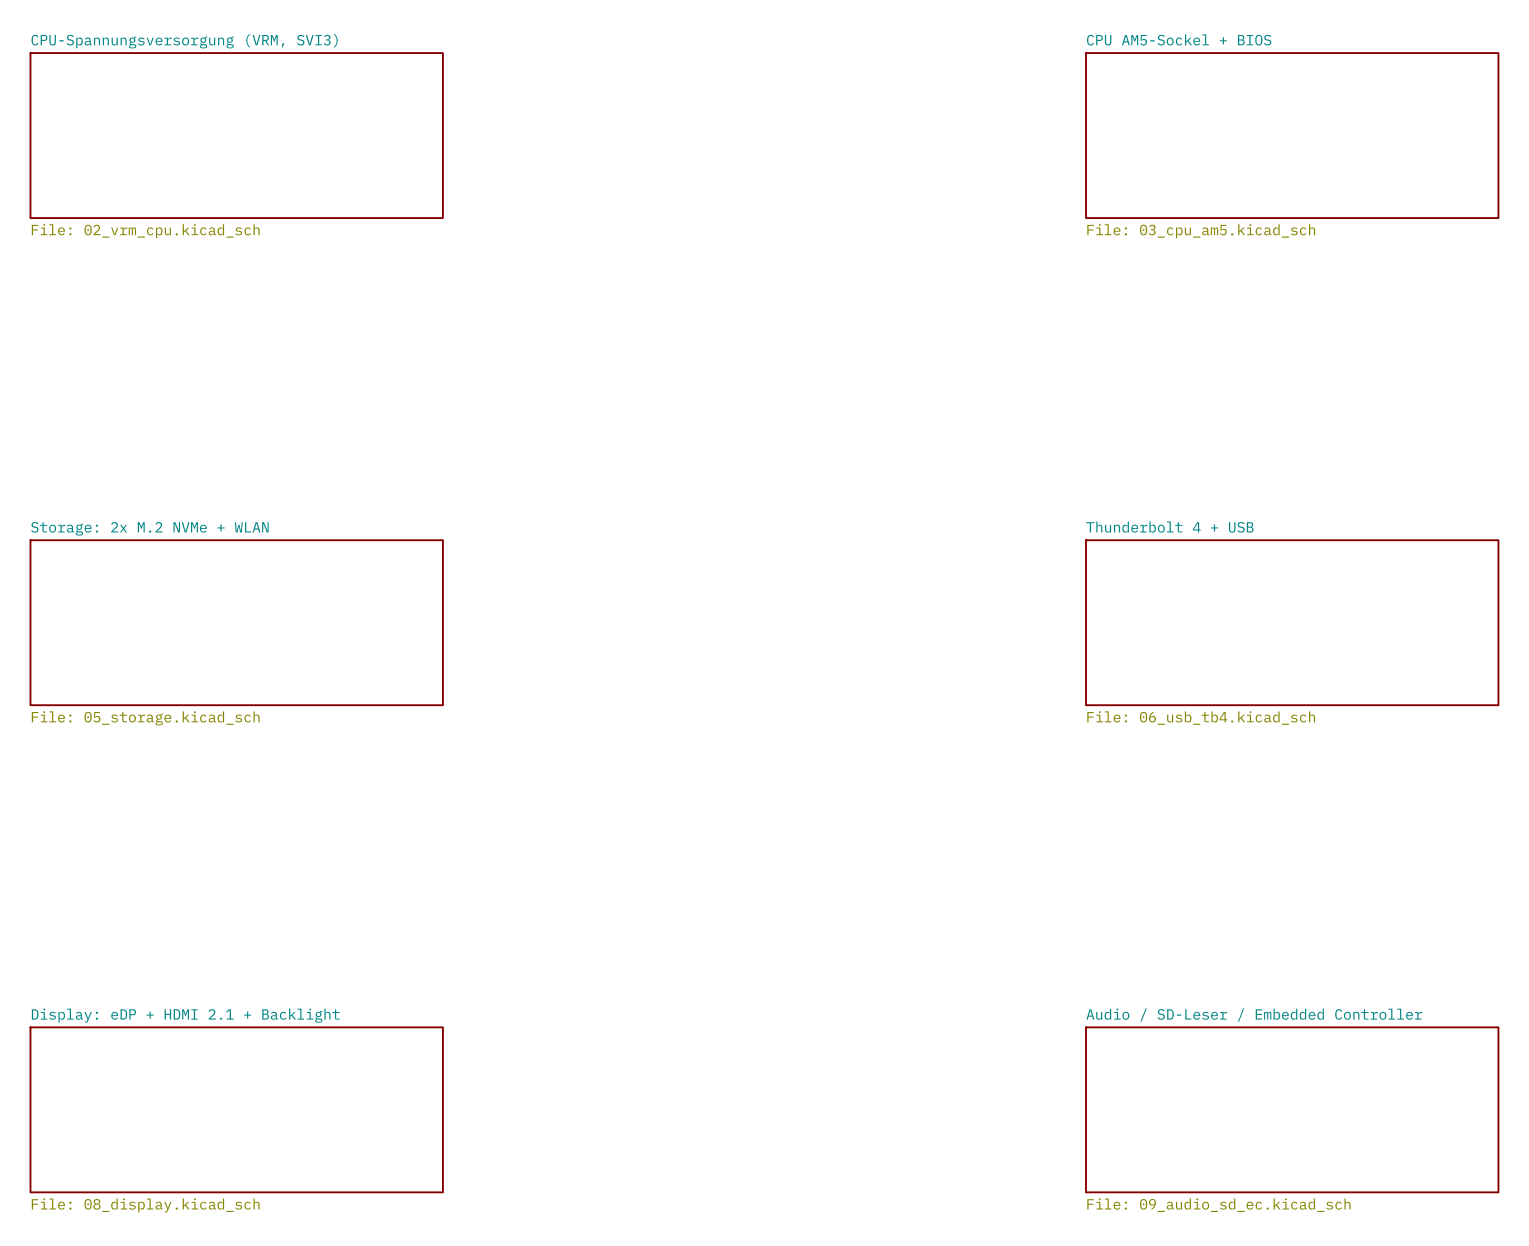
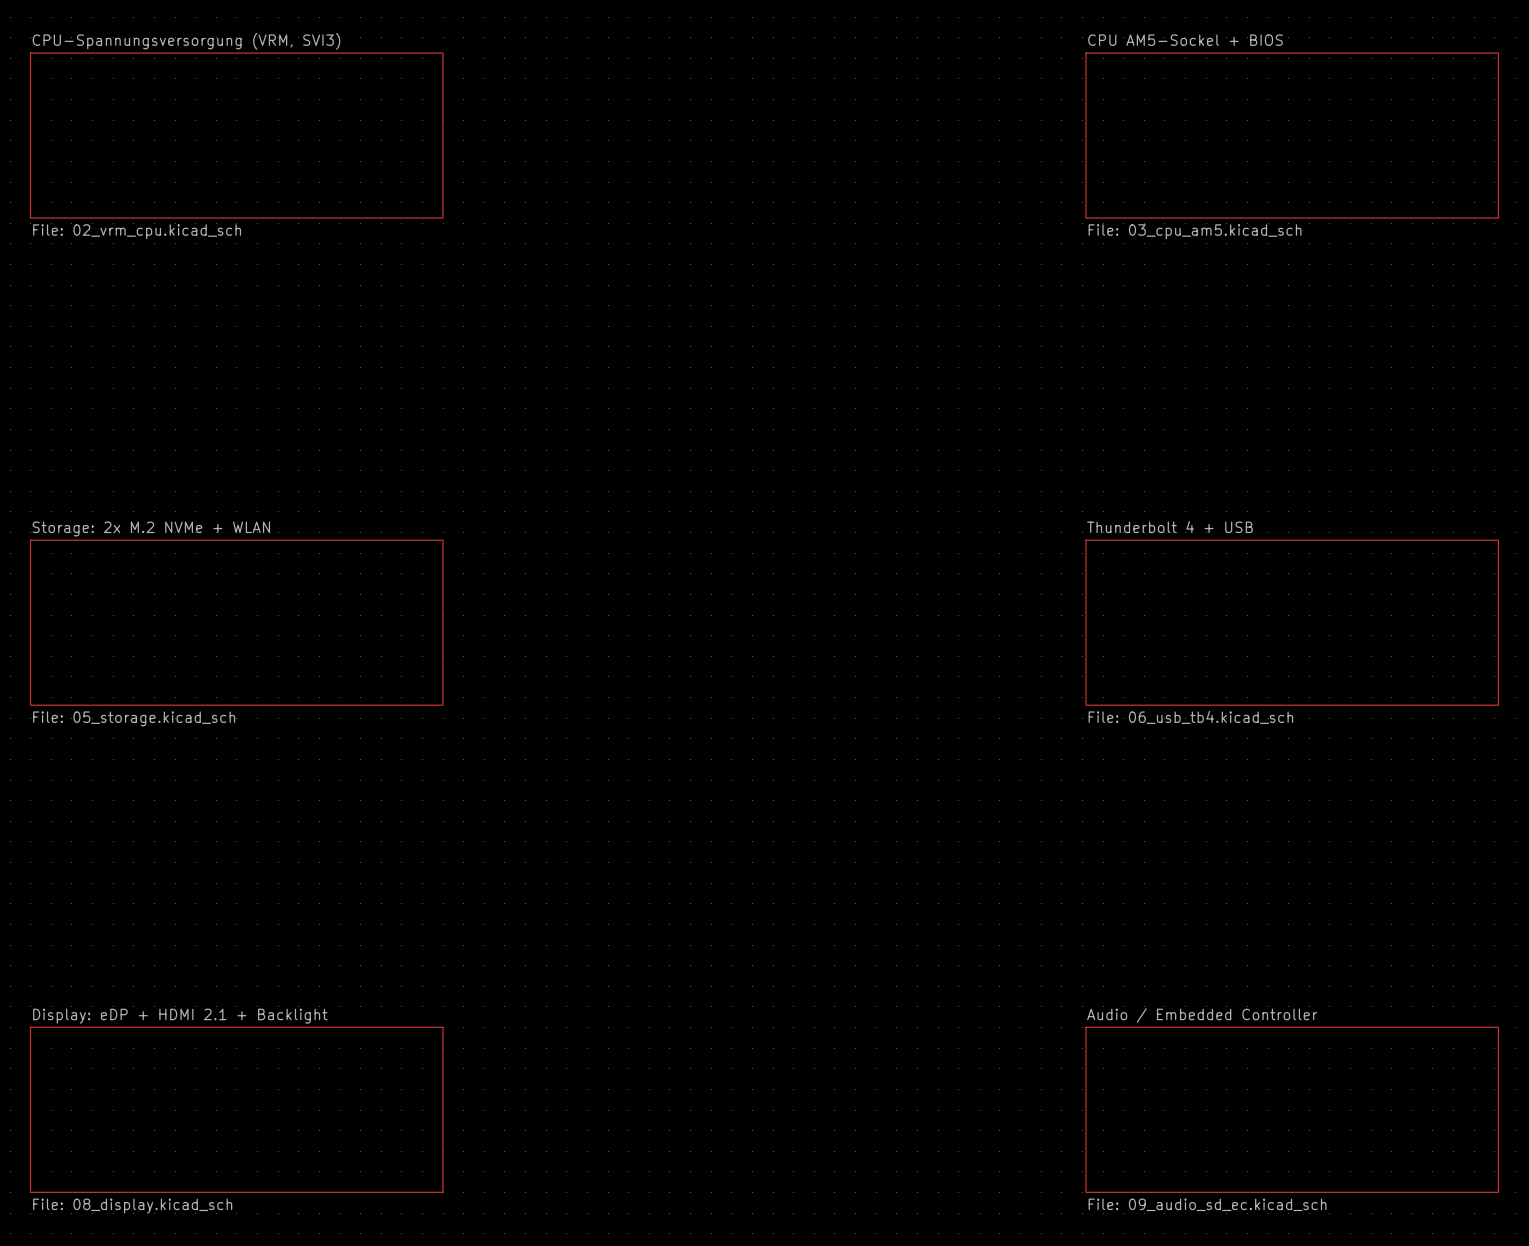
sheet Audio / SD-Leser / Embedded Controller name: Audio / SD-Leser / Embedded Controller (1254, 1015) -> Audio / Embedded Controller (1202, 1015)

